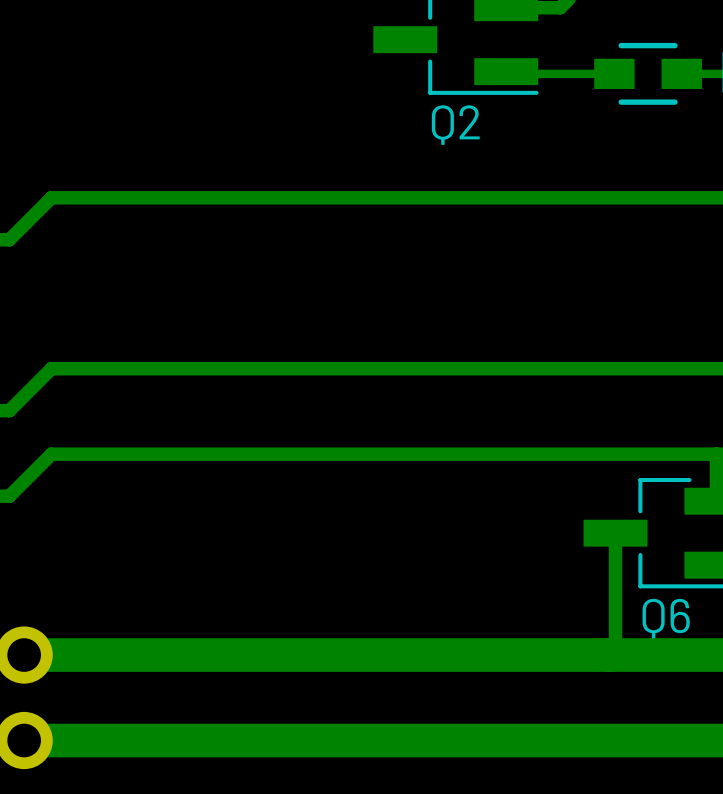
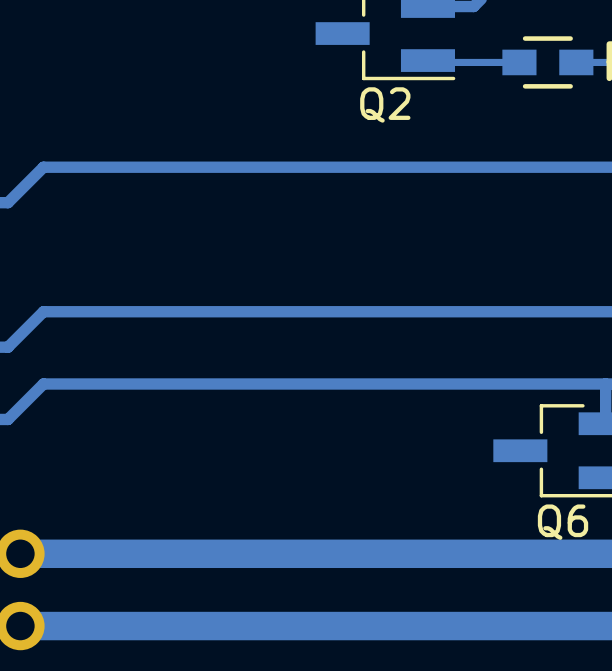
track: (615, 533) (615, 649) (609, 655) -> none

